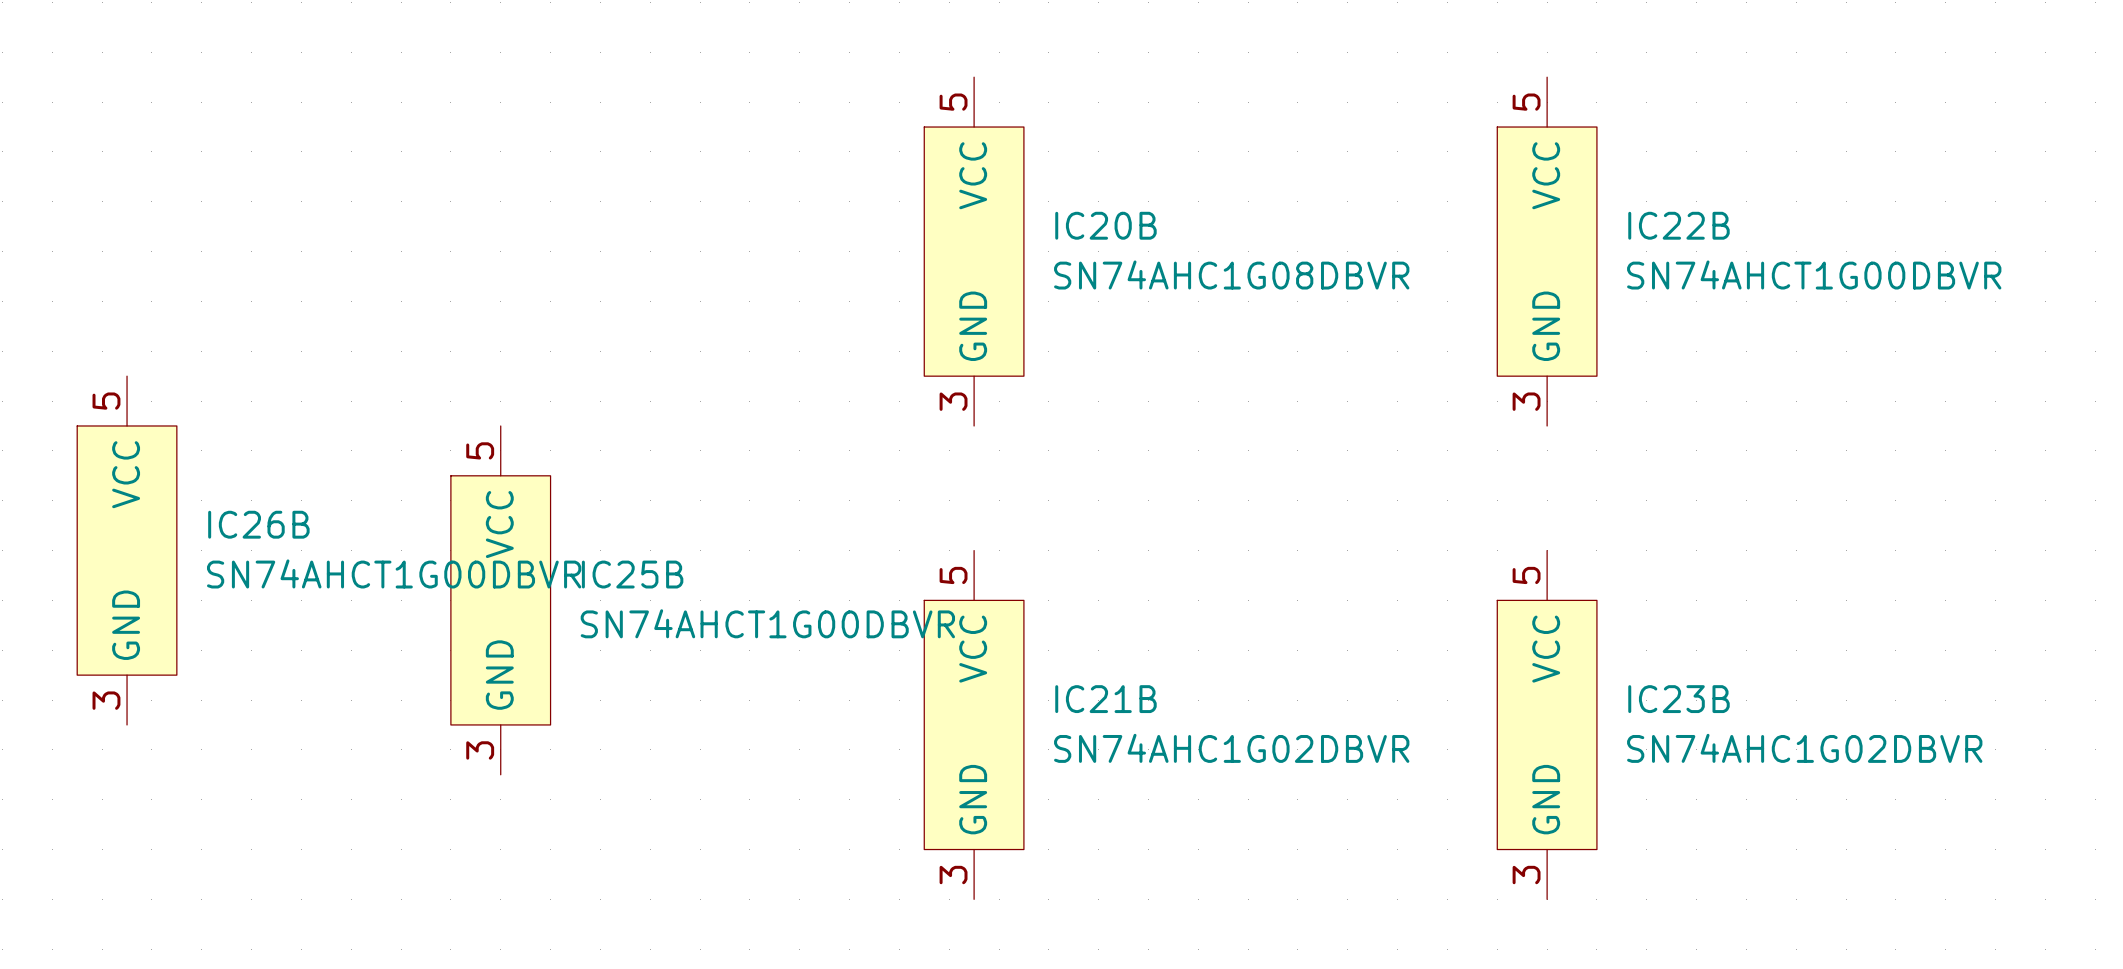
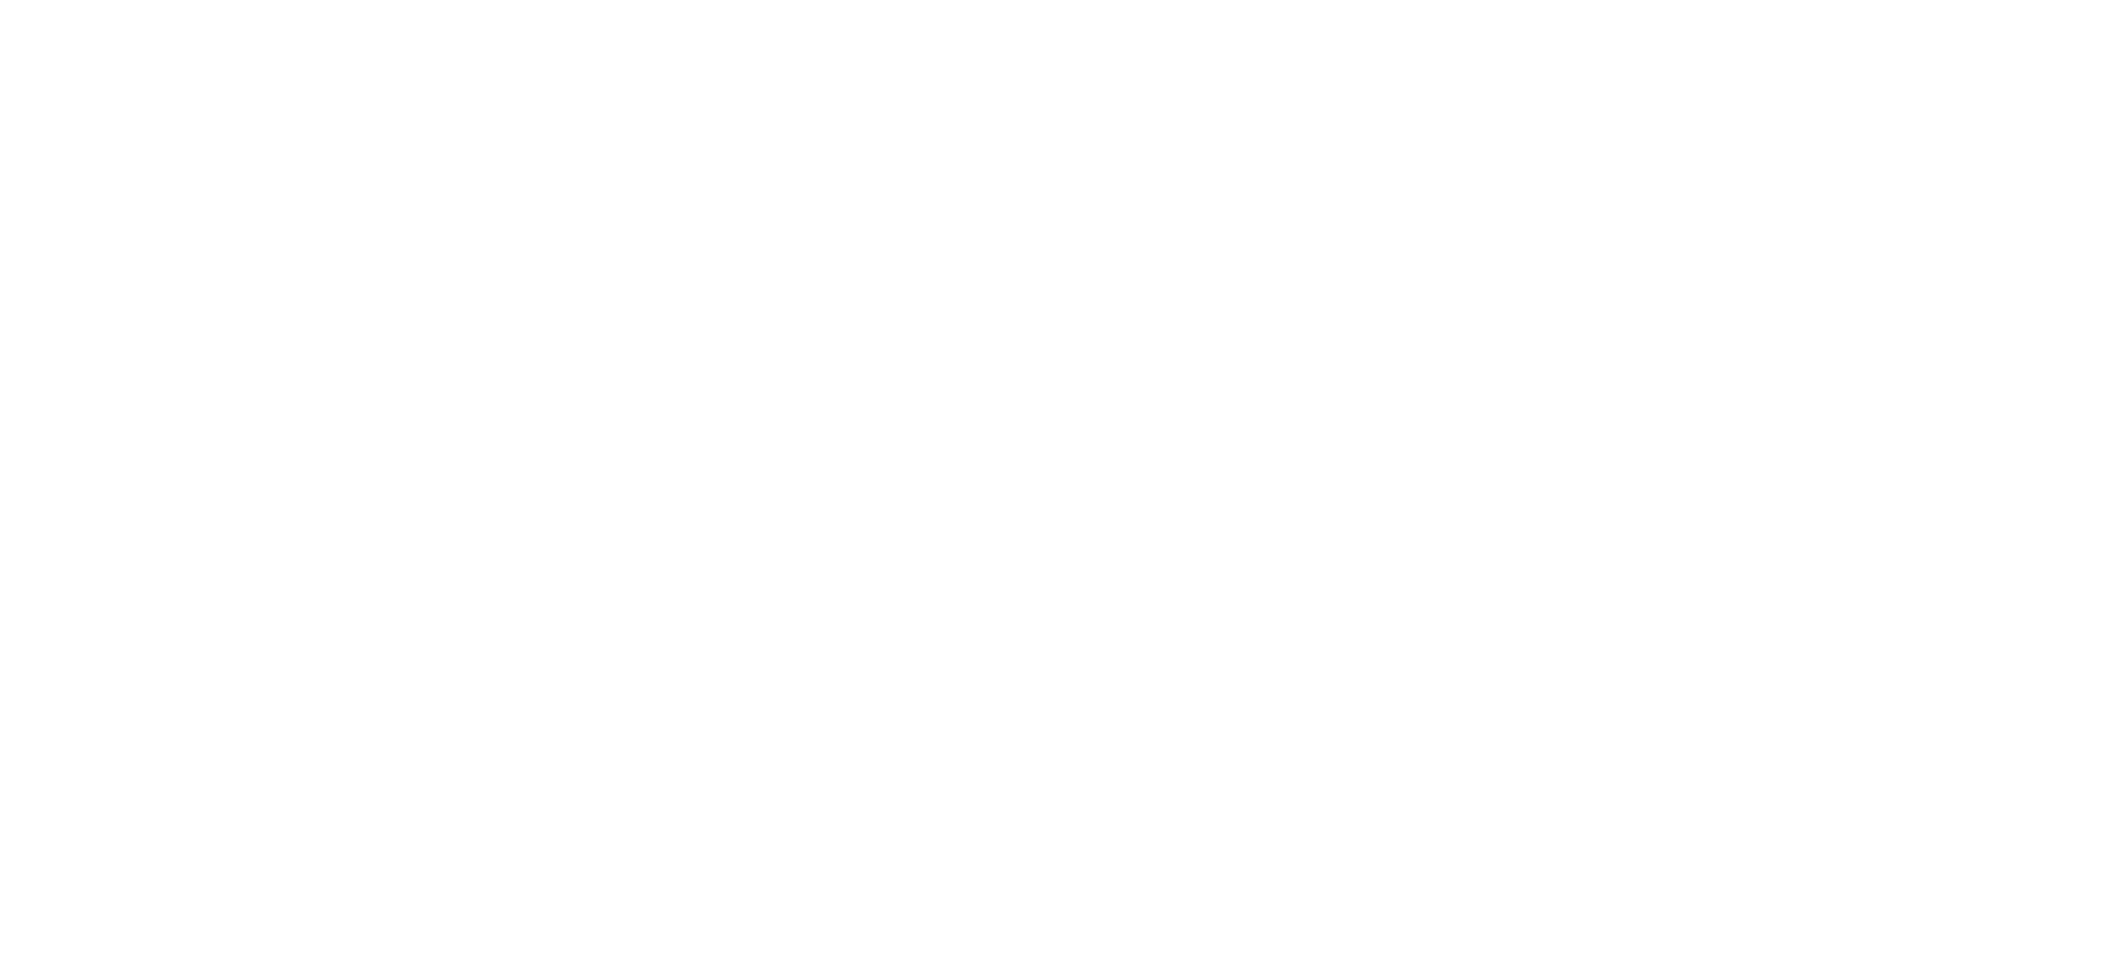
IC20B: SN74AHC1G08DBVR (974, 251) -> none
IC22B: SN74AHCT1G00DBVR (1547, 251) -> none
IC26B: SN74AHCT1G00DBVR (127, 550) -> none
IC25B: SN74AHCT1G00DBVR (500, 600) -> none
IC21B: SN74AHC1G02DBVR (974, 724) -> none
IC23B: SN74AHC1G02DBVR (1547, 724) -> none

